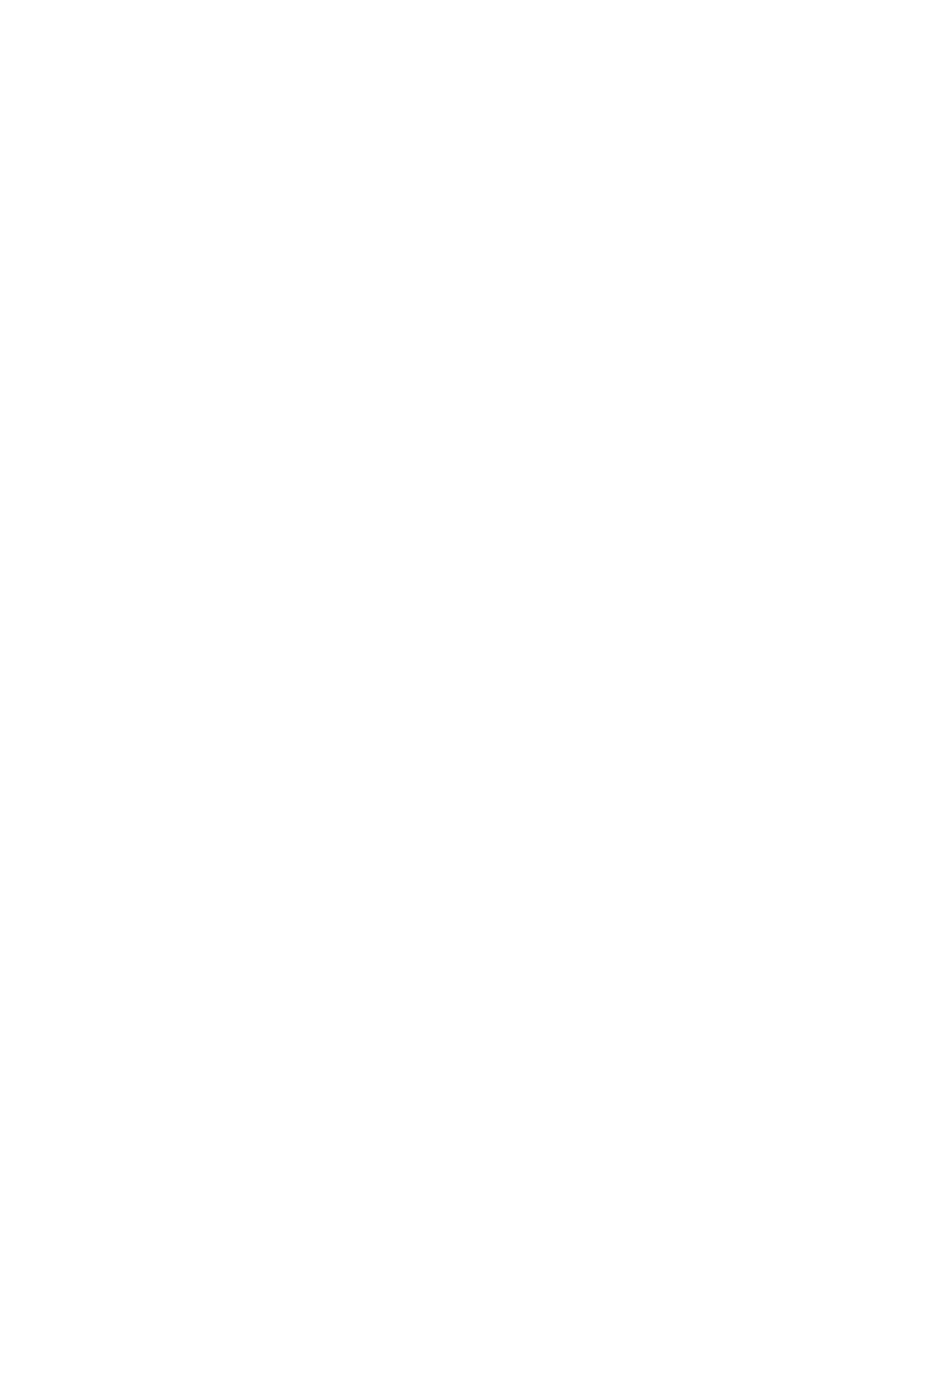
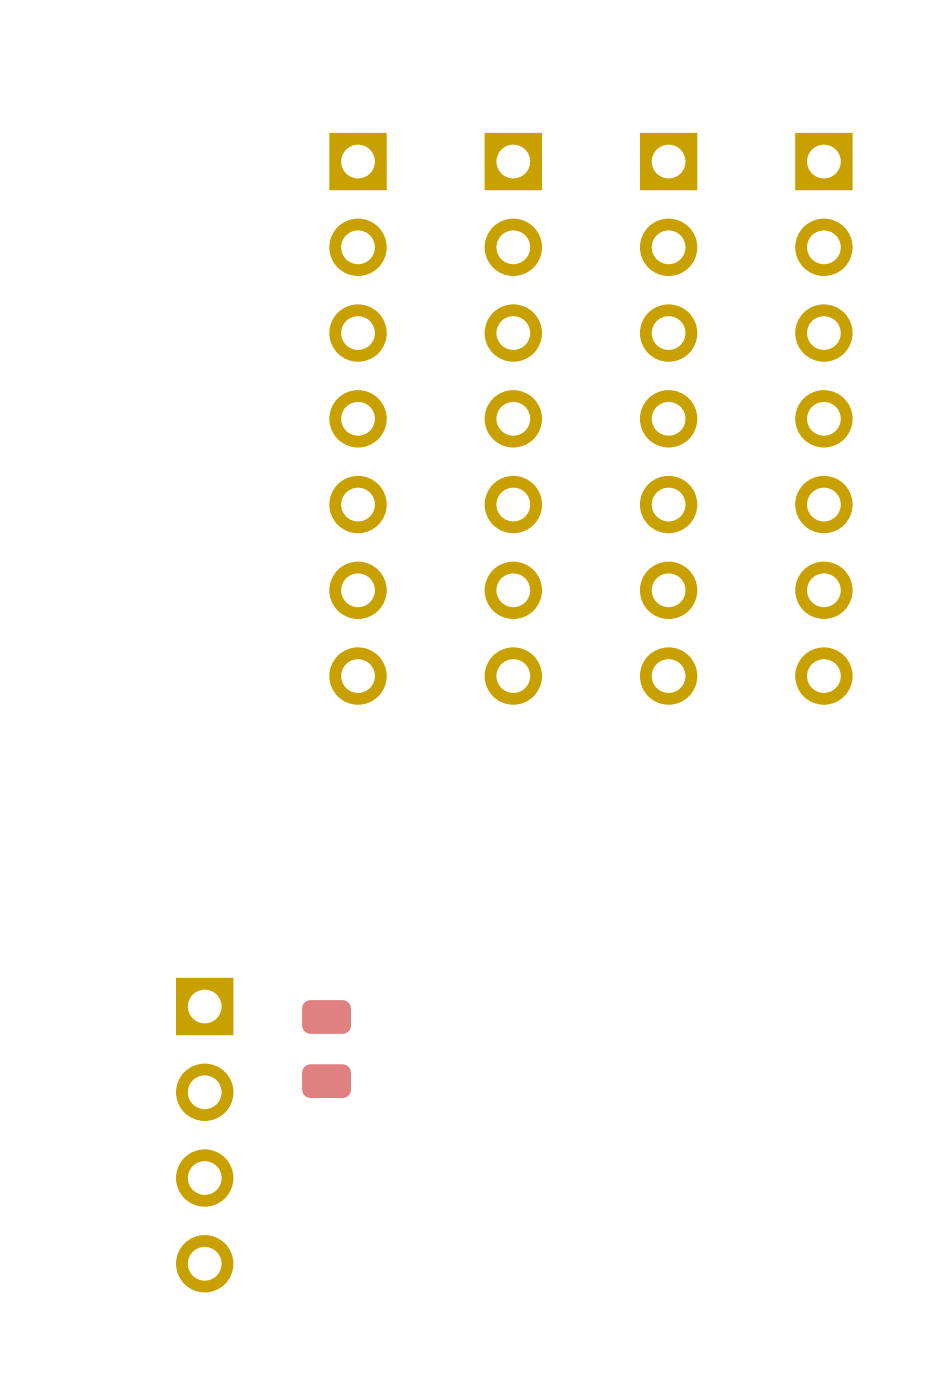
part: none -> (358, 418)
part: none -> (513, 418)
part: none -> (668, 418)
part: none -> (823, 418)
part: none -> (326, 1049)
part: none -> (204, 1135)

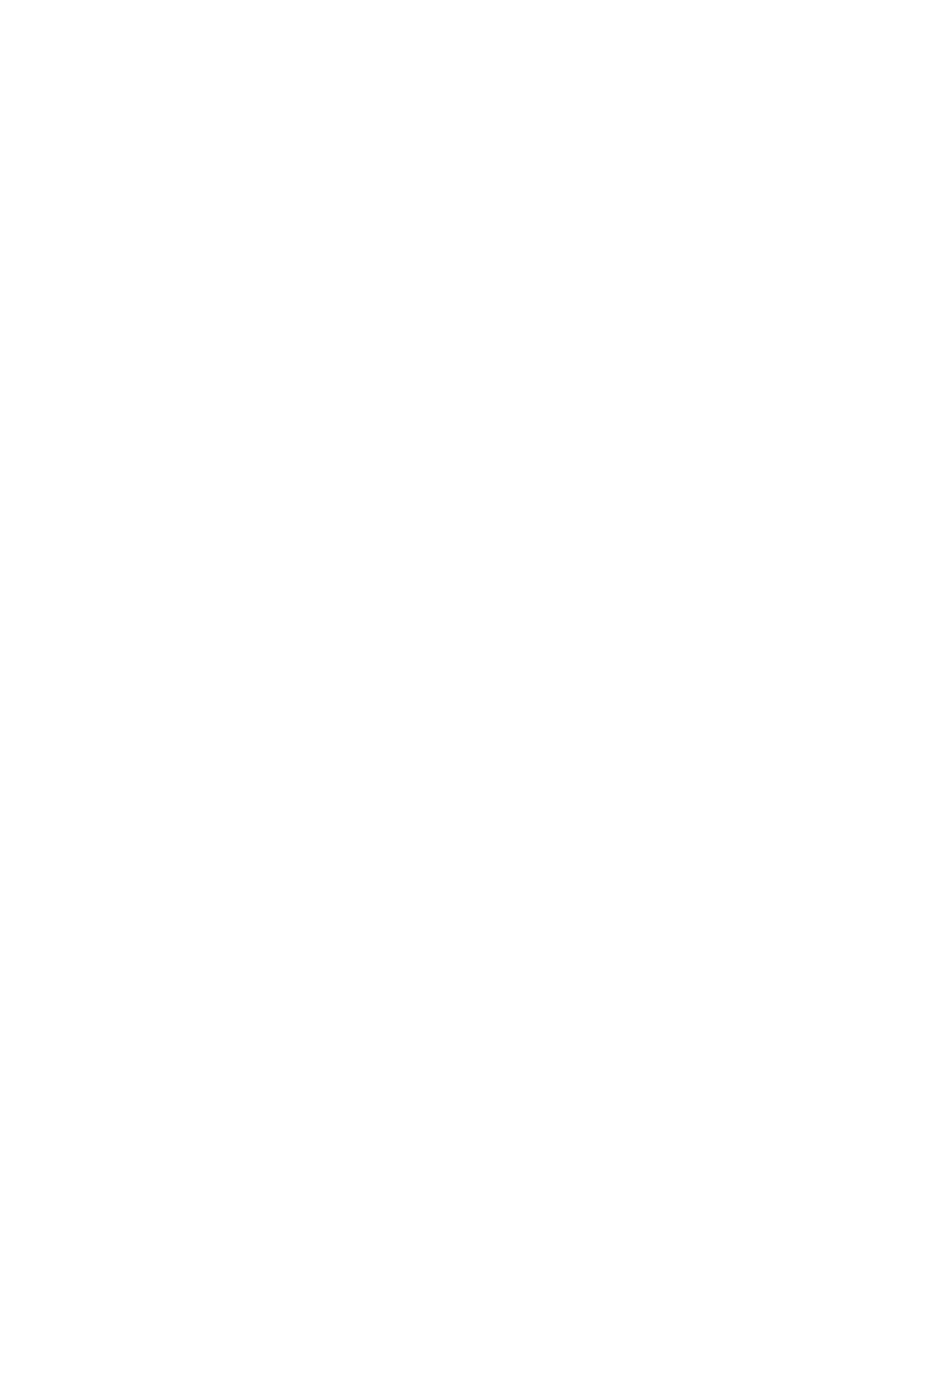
part: (358, 418) -> none
part: (513, 418) -> none
part: (668, 418) -> none
part: (823, 418) -> none
part: (326, 1049) -> none
part: (204, 1135) -> none

